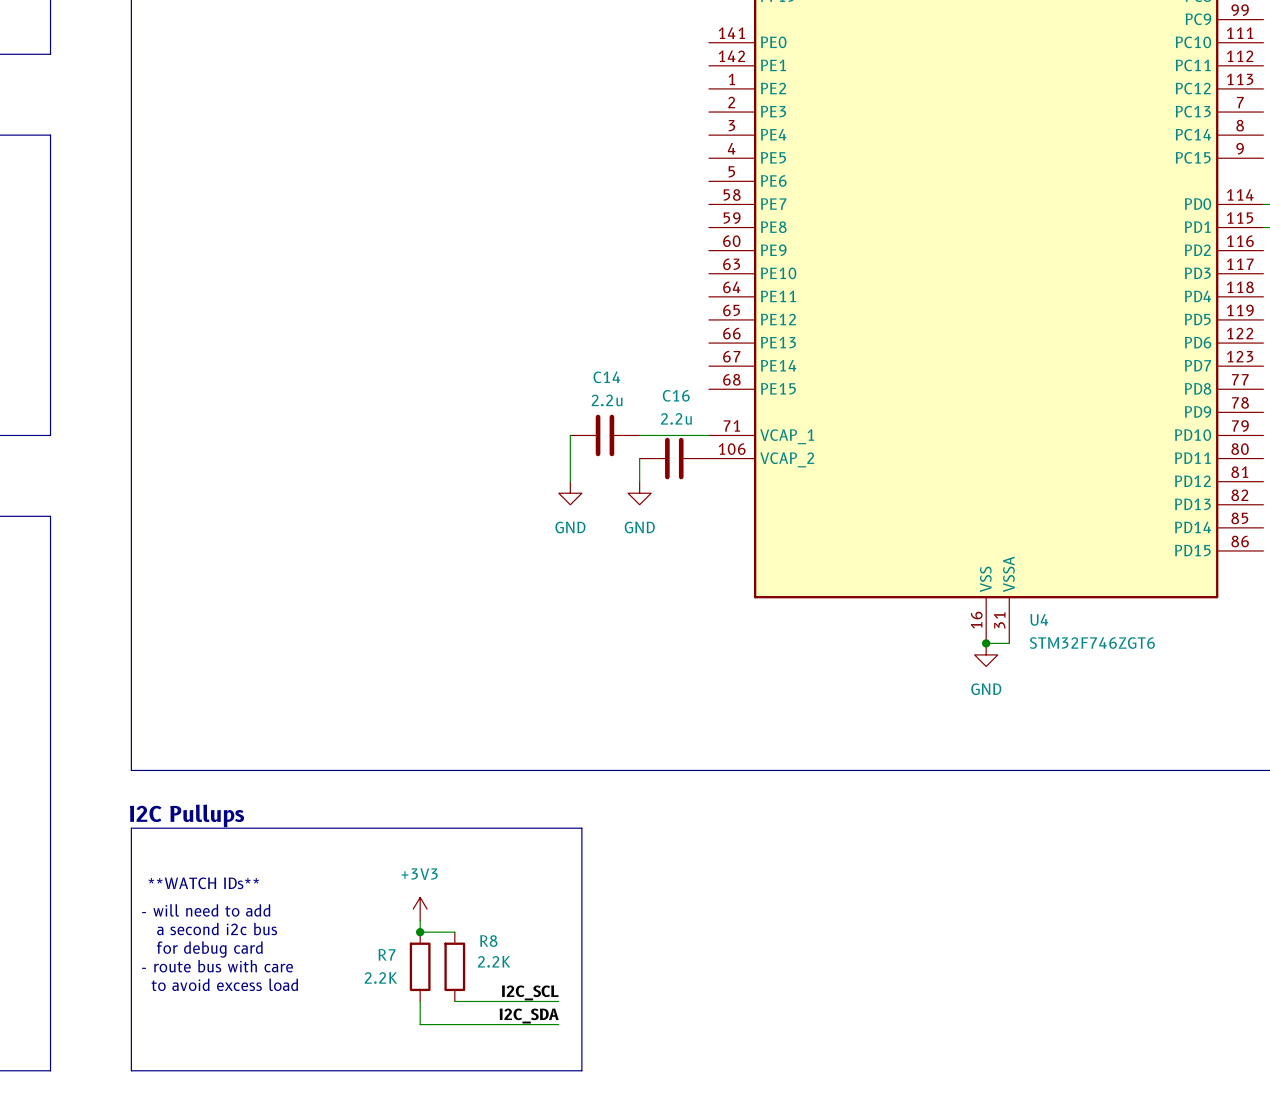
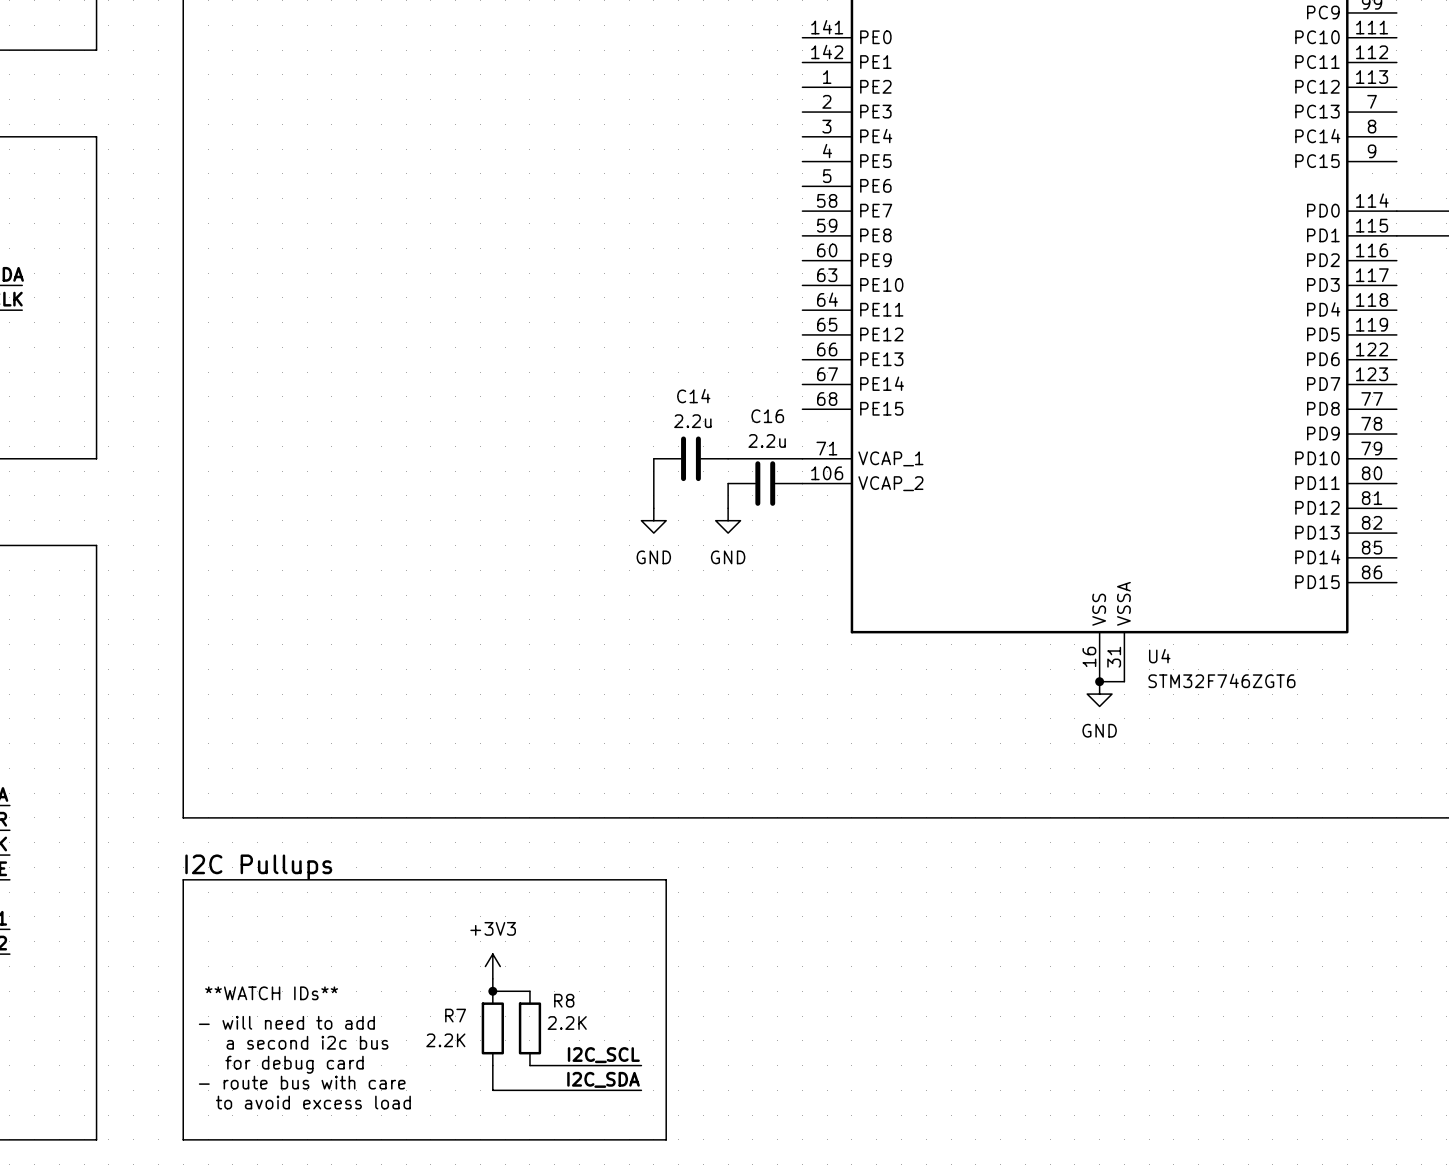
text position: **WATCH IDs** (203, 883) -> **WATCH IDs** (271, 993)
text position: - will need to add (206, 910) -> - will need to add (286, 1022)
text position: a second i2c bus (217, 929) -> a second i2c bus (307, 1042)
text position: for debug card (209, 949) -> for debug card (294, 1064)
text position: - route bus with care (217, 966) -> - route bus with care (302, 1082)
text position: to avoid excess load (224, 984) -> to avoid excess load (313, 1102)

